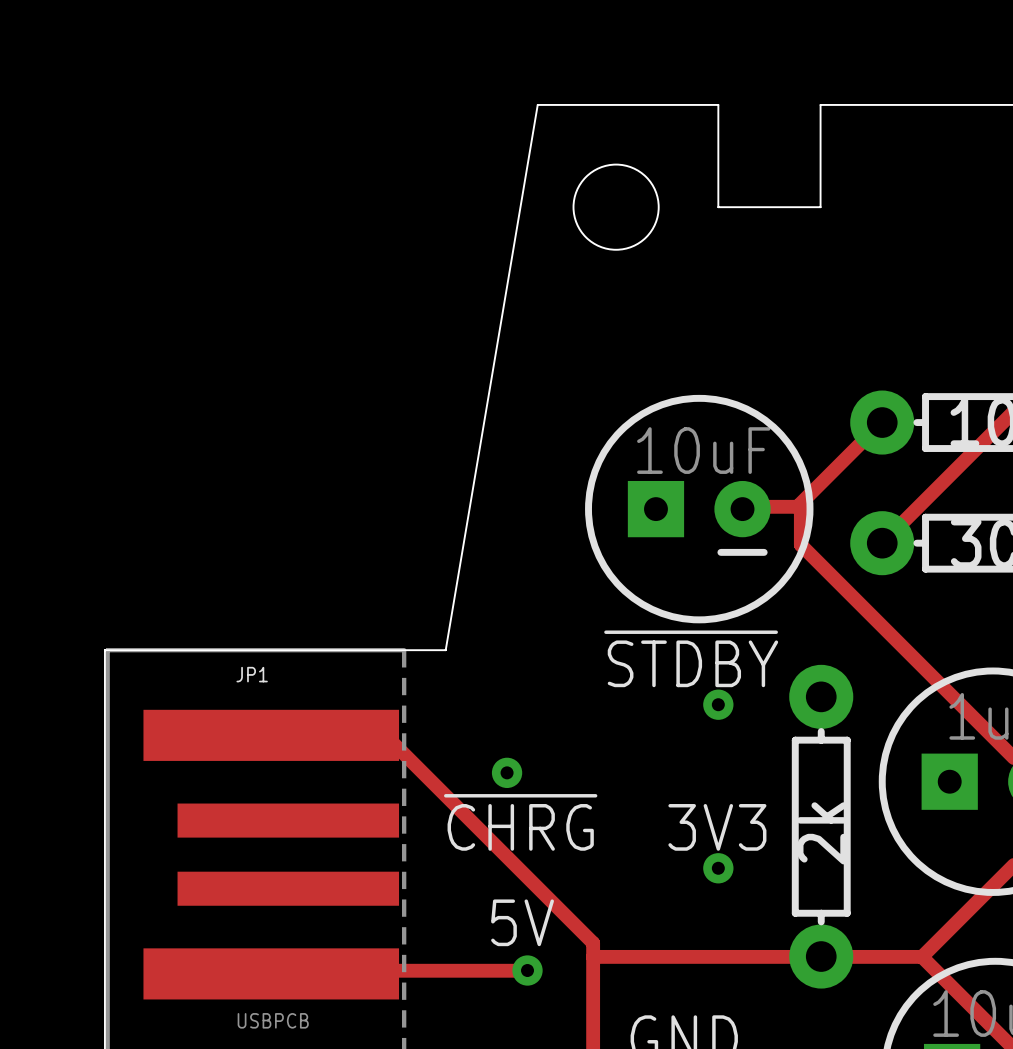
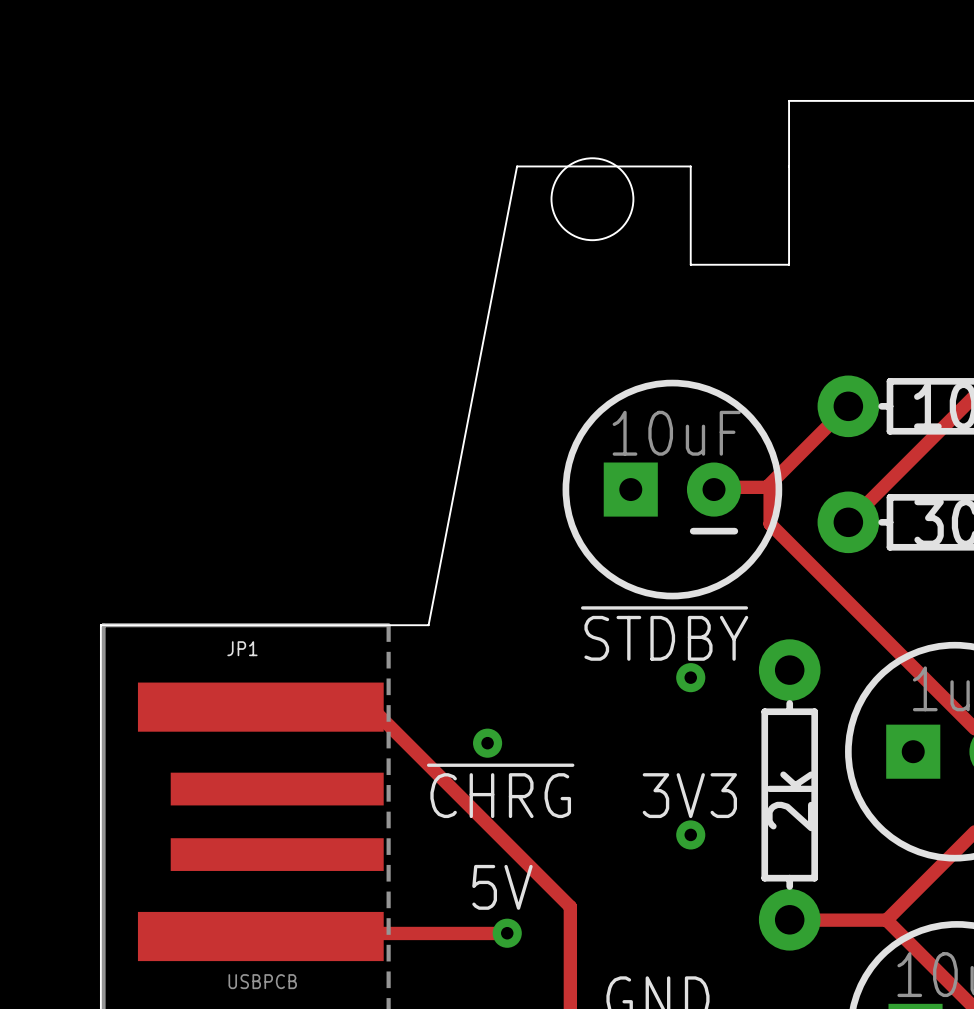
board edge: (718, 173) (718, 104) (537, 104) (445, 650) -> (690, 166) (517, 166) (428, 625)
board edge: (718, 207) (820, 207) -> (690, 199) (690, 264) (789, 264) (789, 199)
track: (821, 956) (593, 956) -> none

